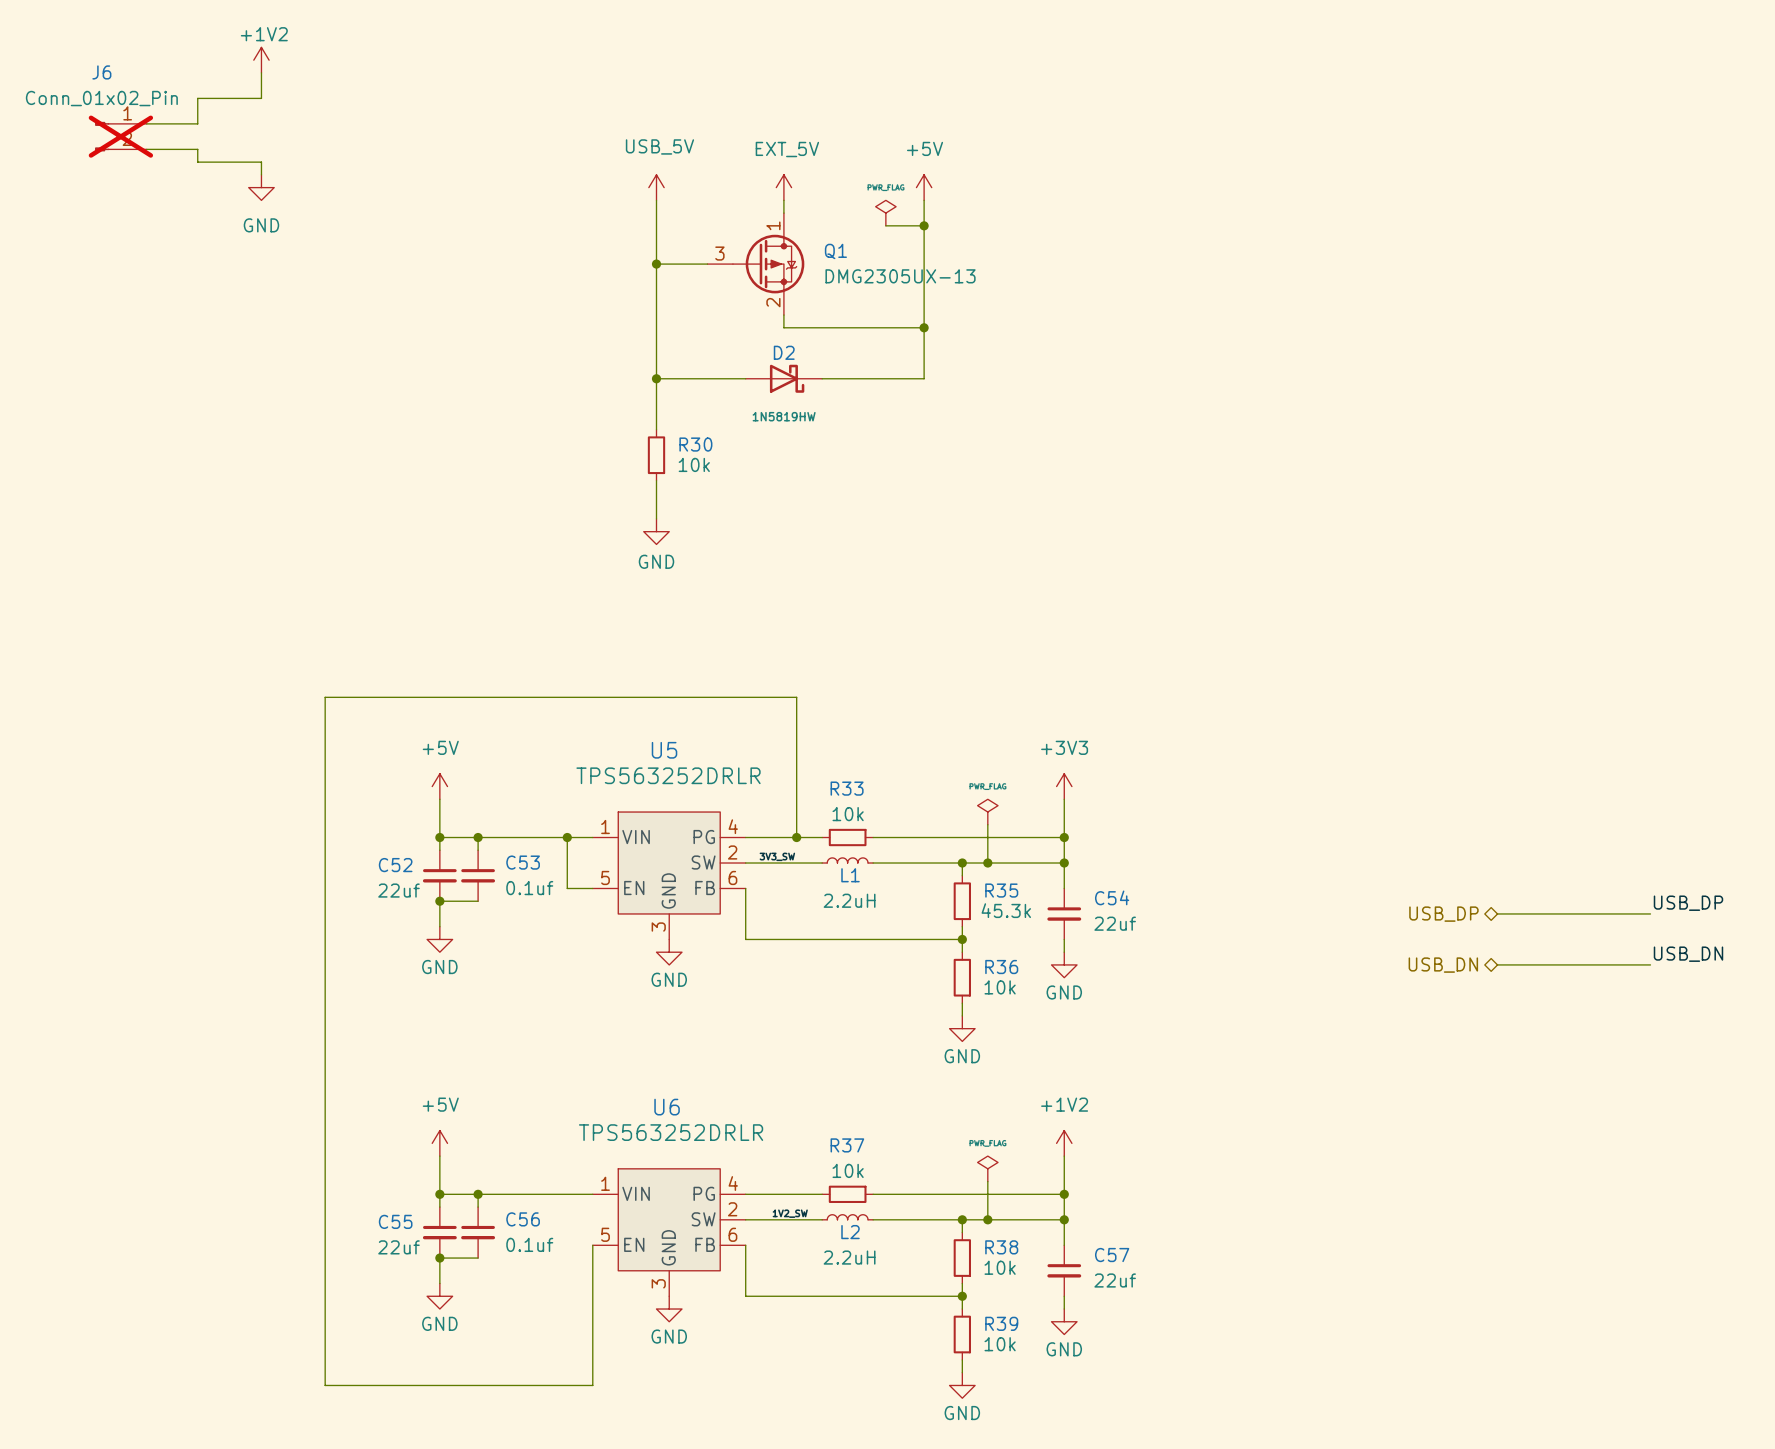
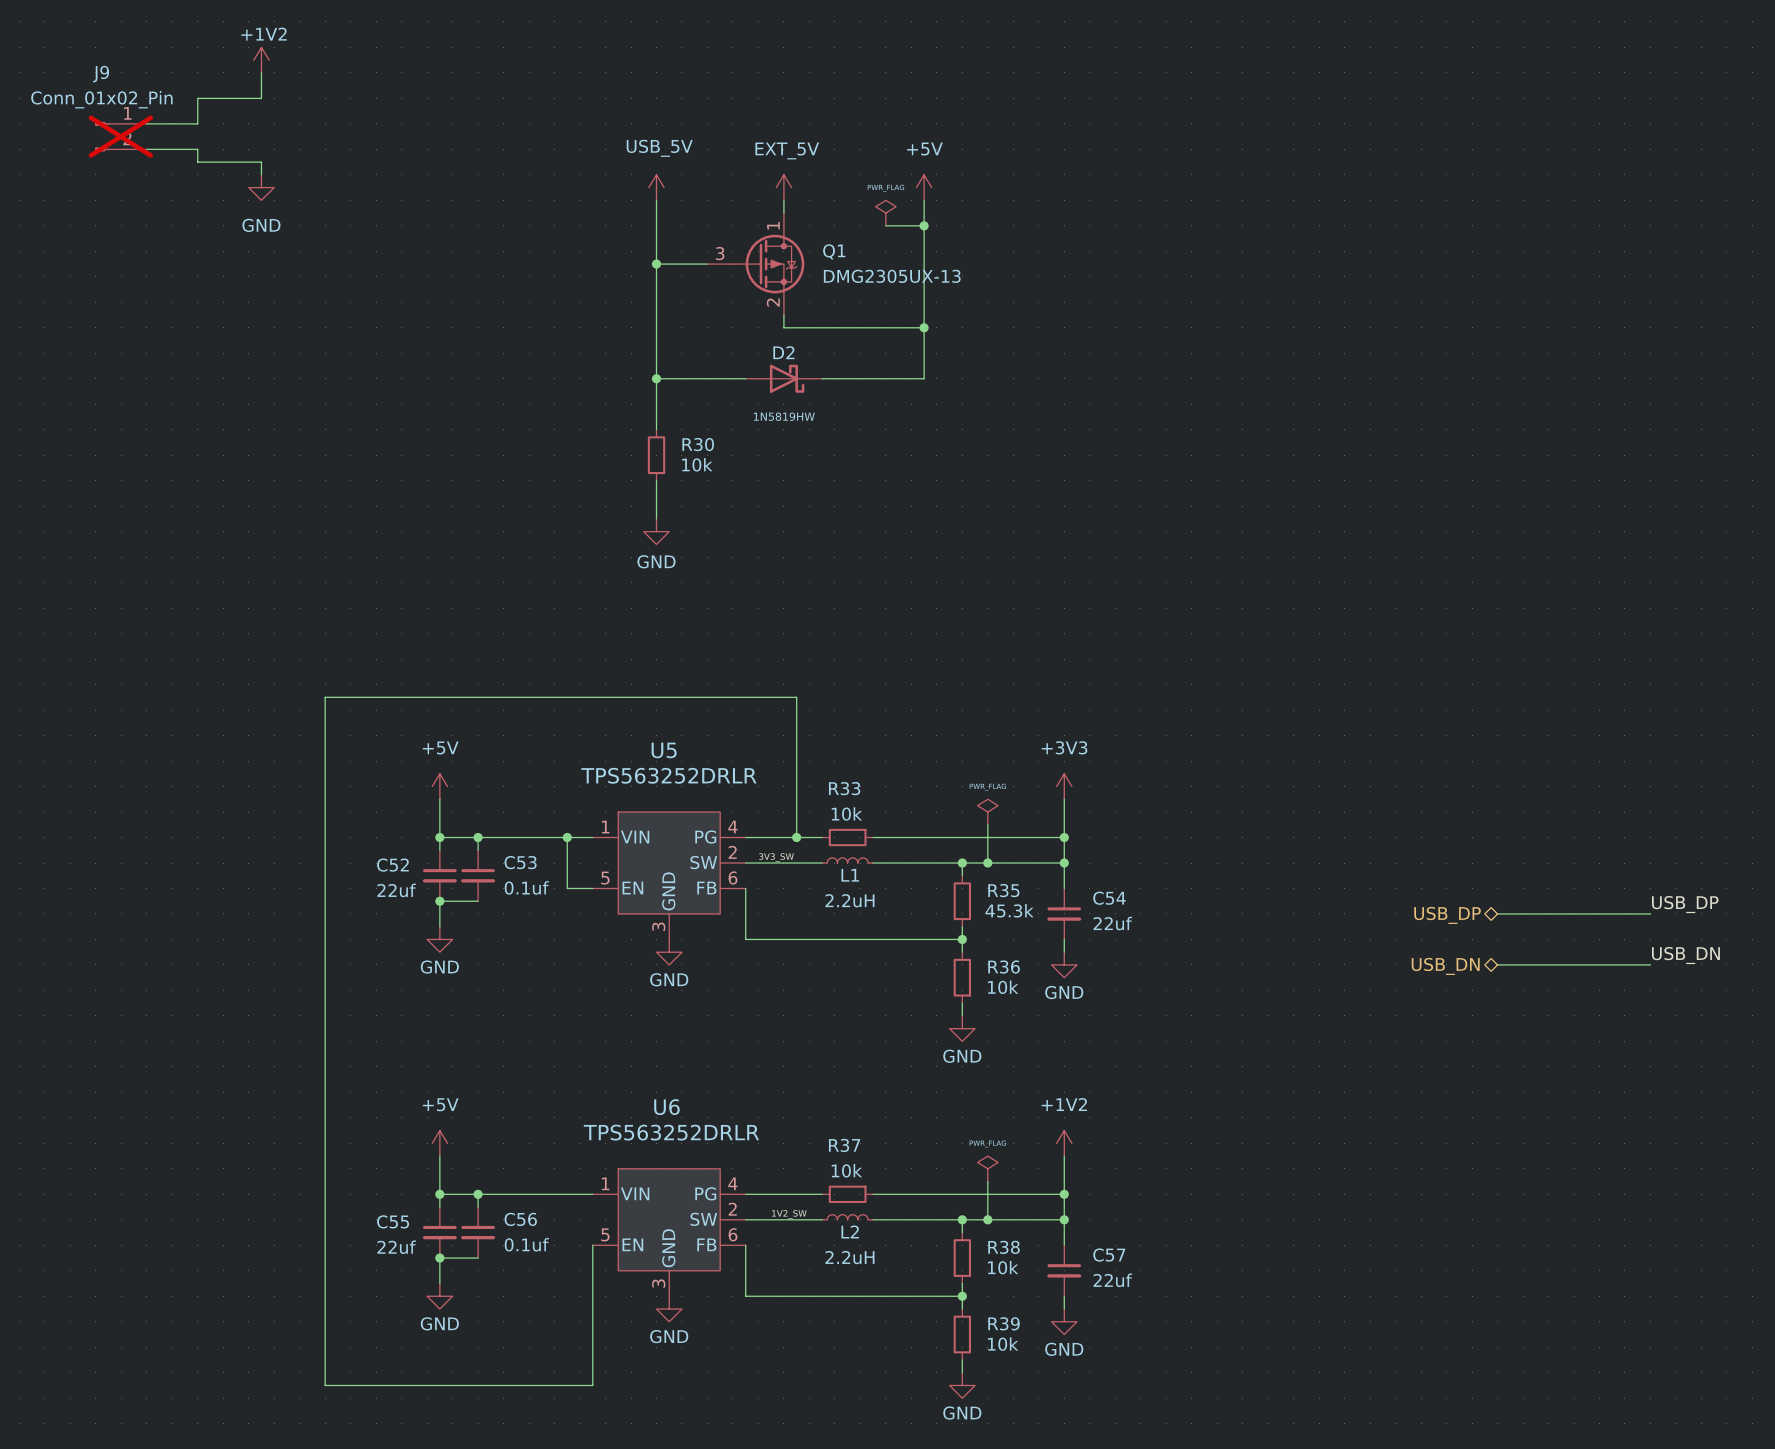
J6 name: J6 (101, 72) -> J9 (101, 74)

